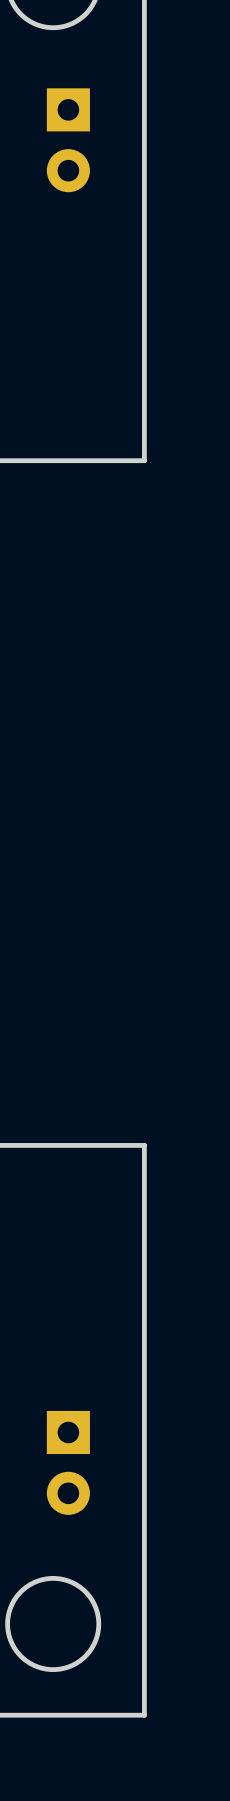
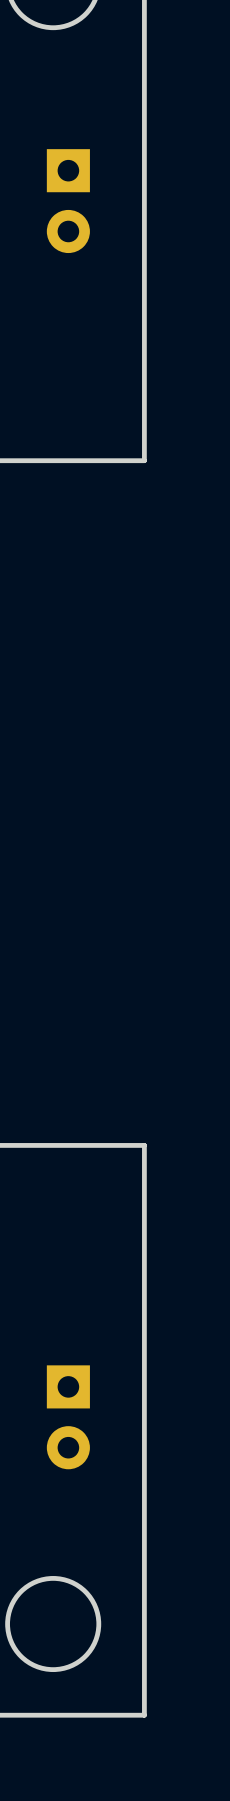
part position: (68, 140) -> (68, 201)
part position: (68, 1462) -> (68, 1417)

